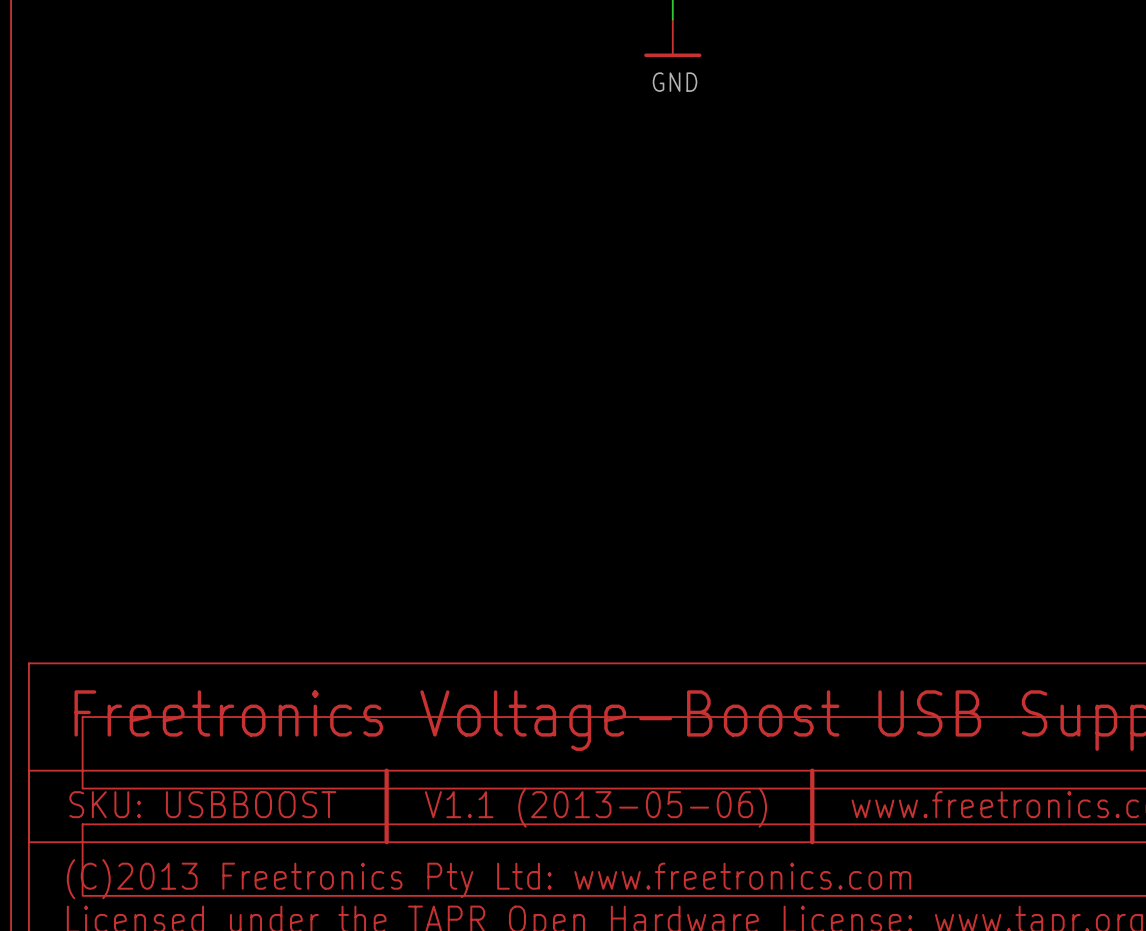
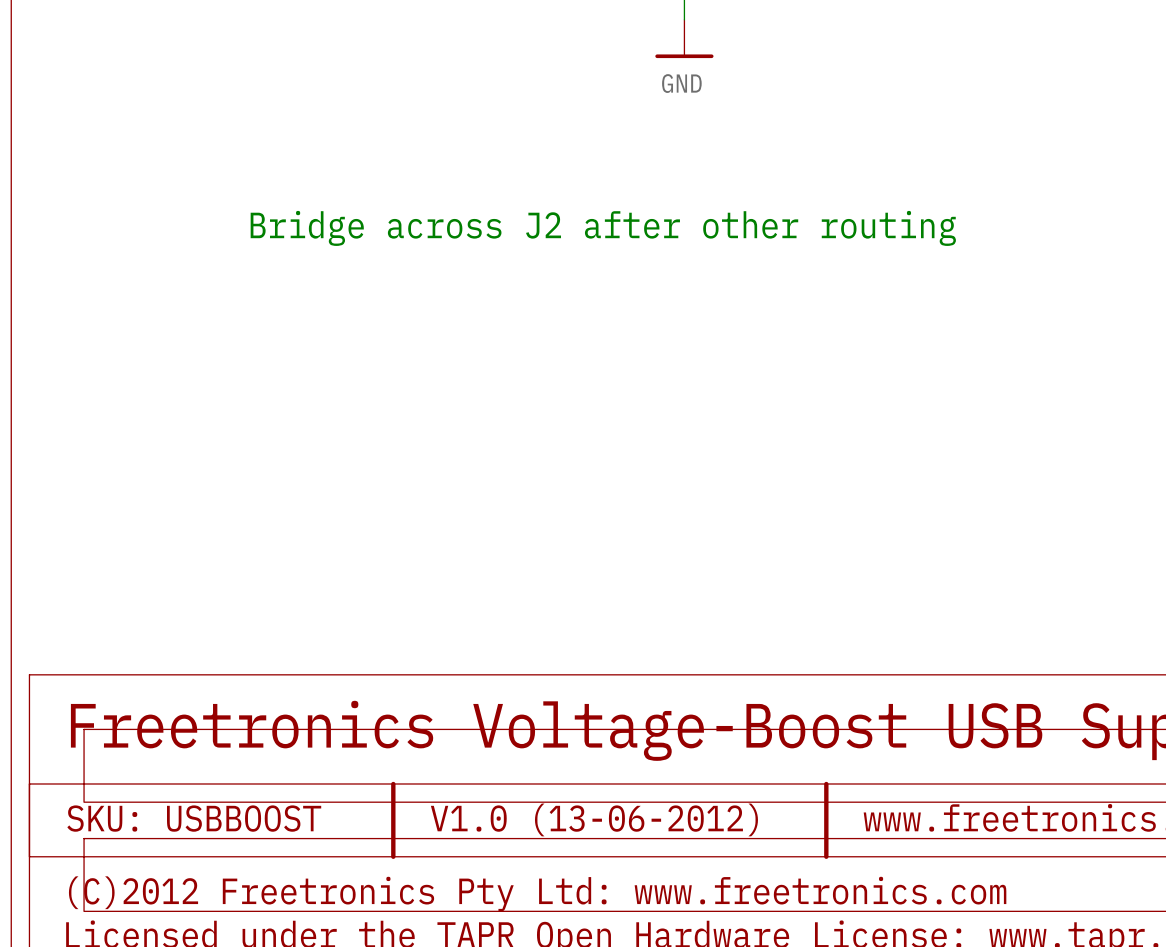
text: none -> Bridge across J2 after other routing (603, 228)
text: V1.1 (2013-05-06) (595, 807) -> V1.0 (13-06-2012) (594, 819)
text: (C)2013 Freetronics Pty Ltd: www.freetronics.com (489, 879) -> (C)2012 Freetronics Pty Ltd: www.freetronics.com (537, 893)

